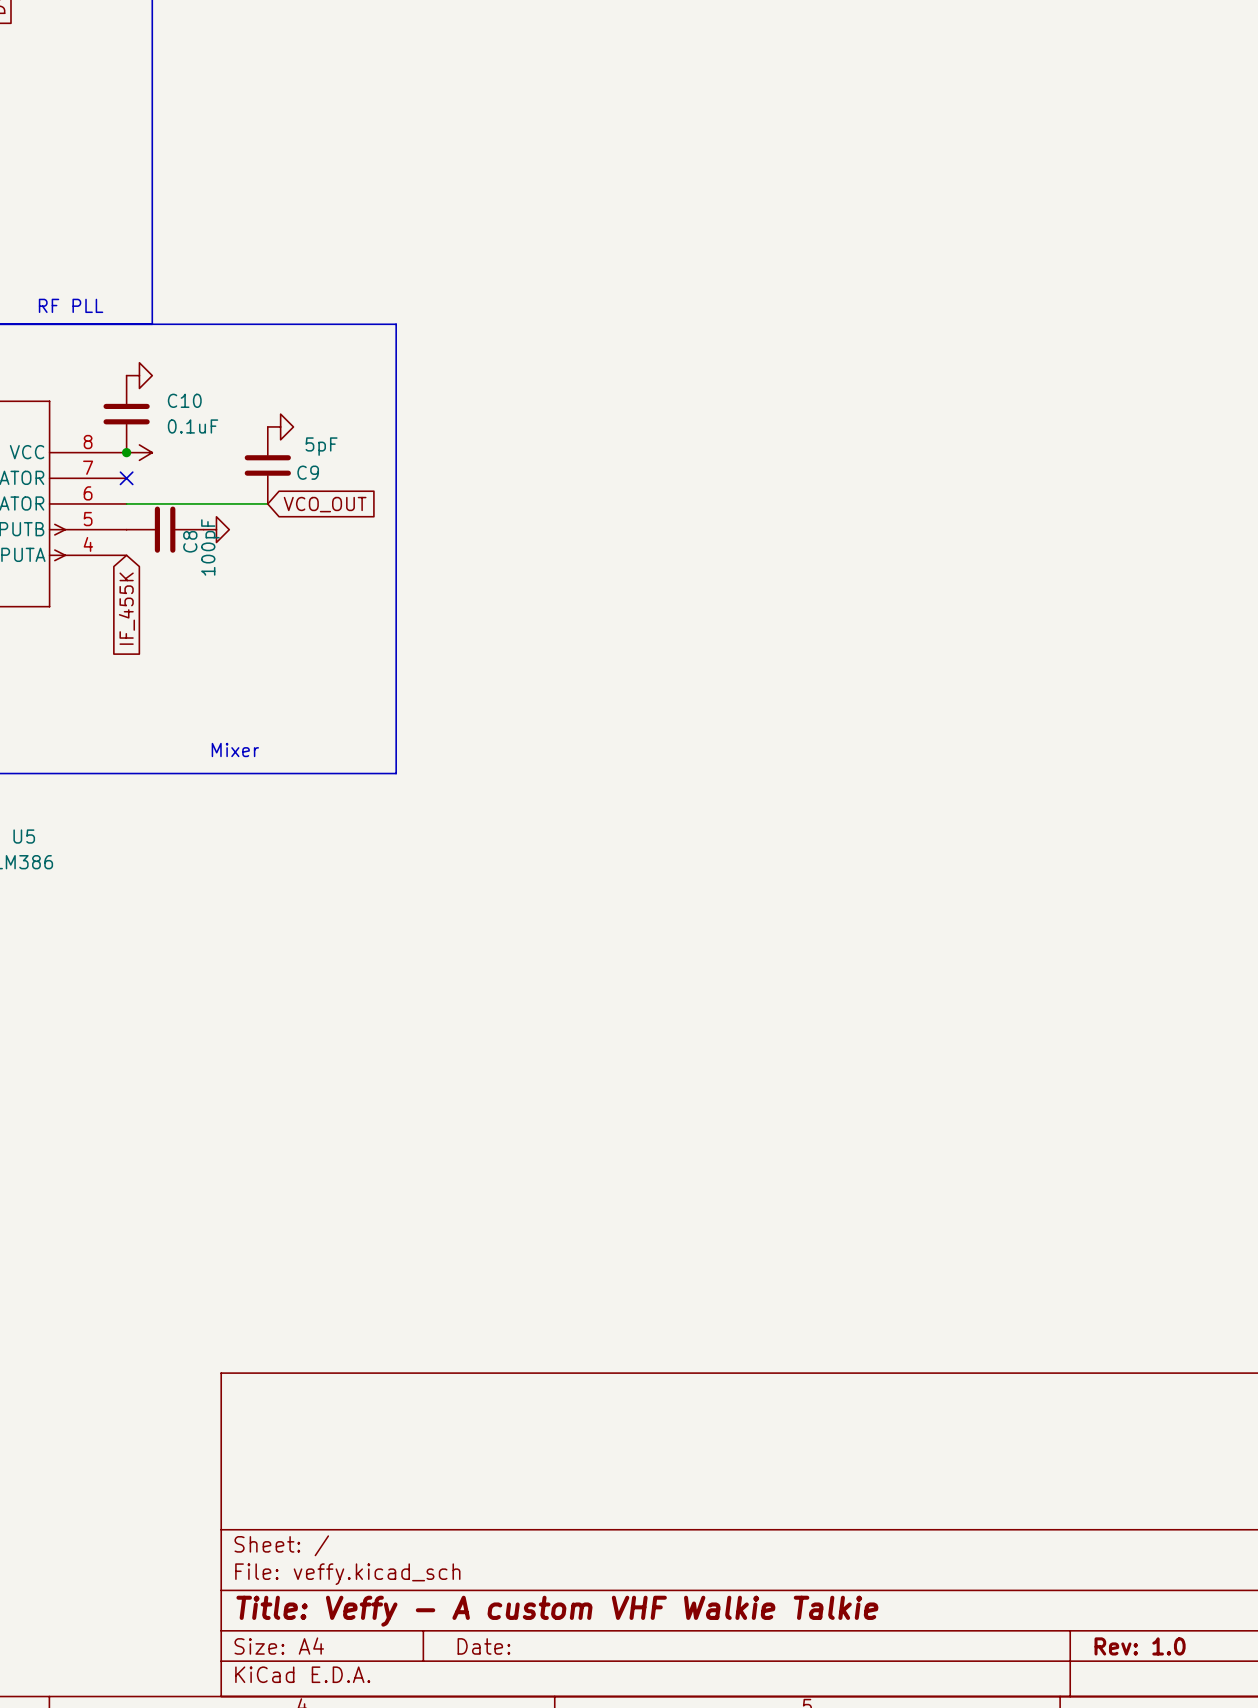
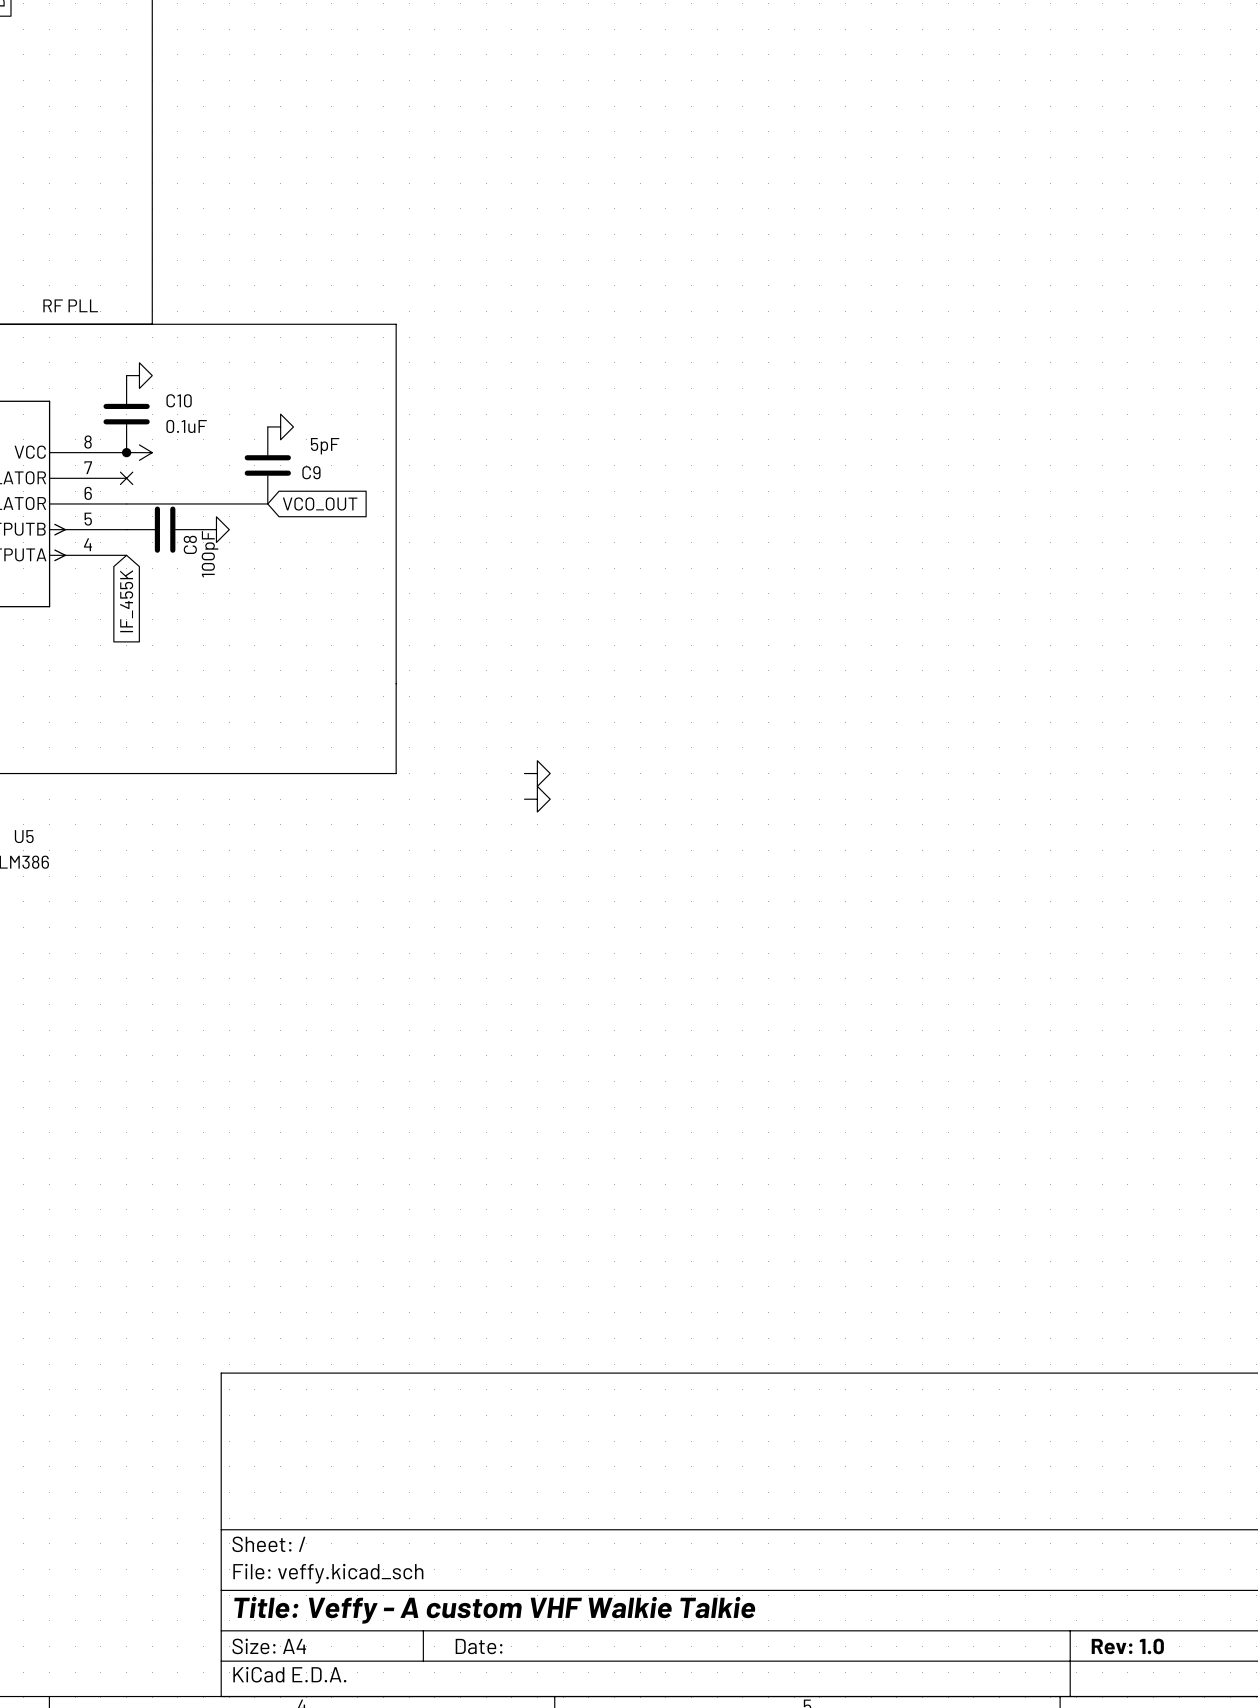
text: Mixer (235, 749) -> none
power symbol: none -> (537, 773)
power symbol: none -> (537, 799)

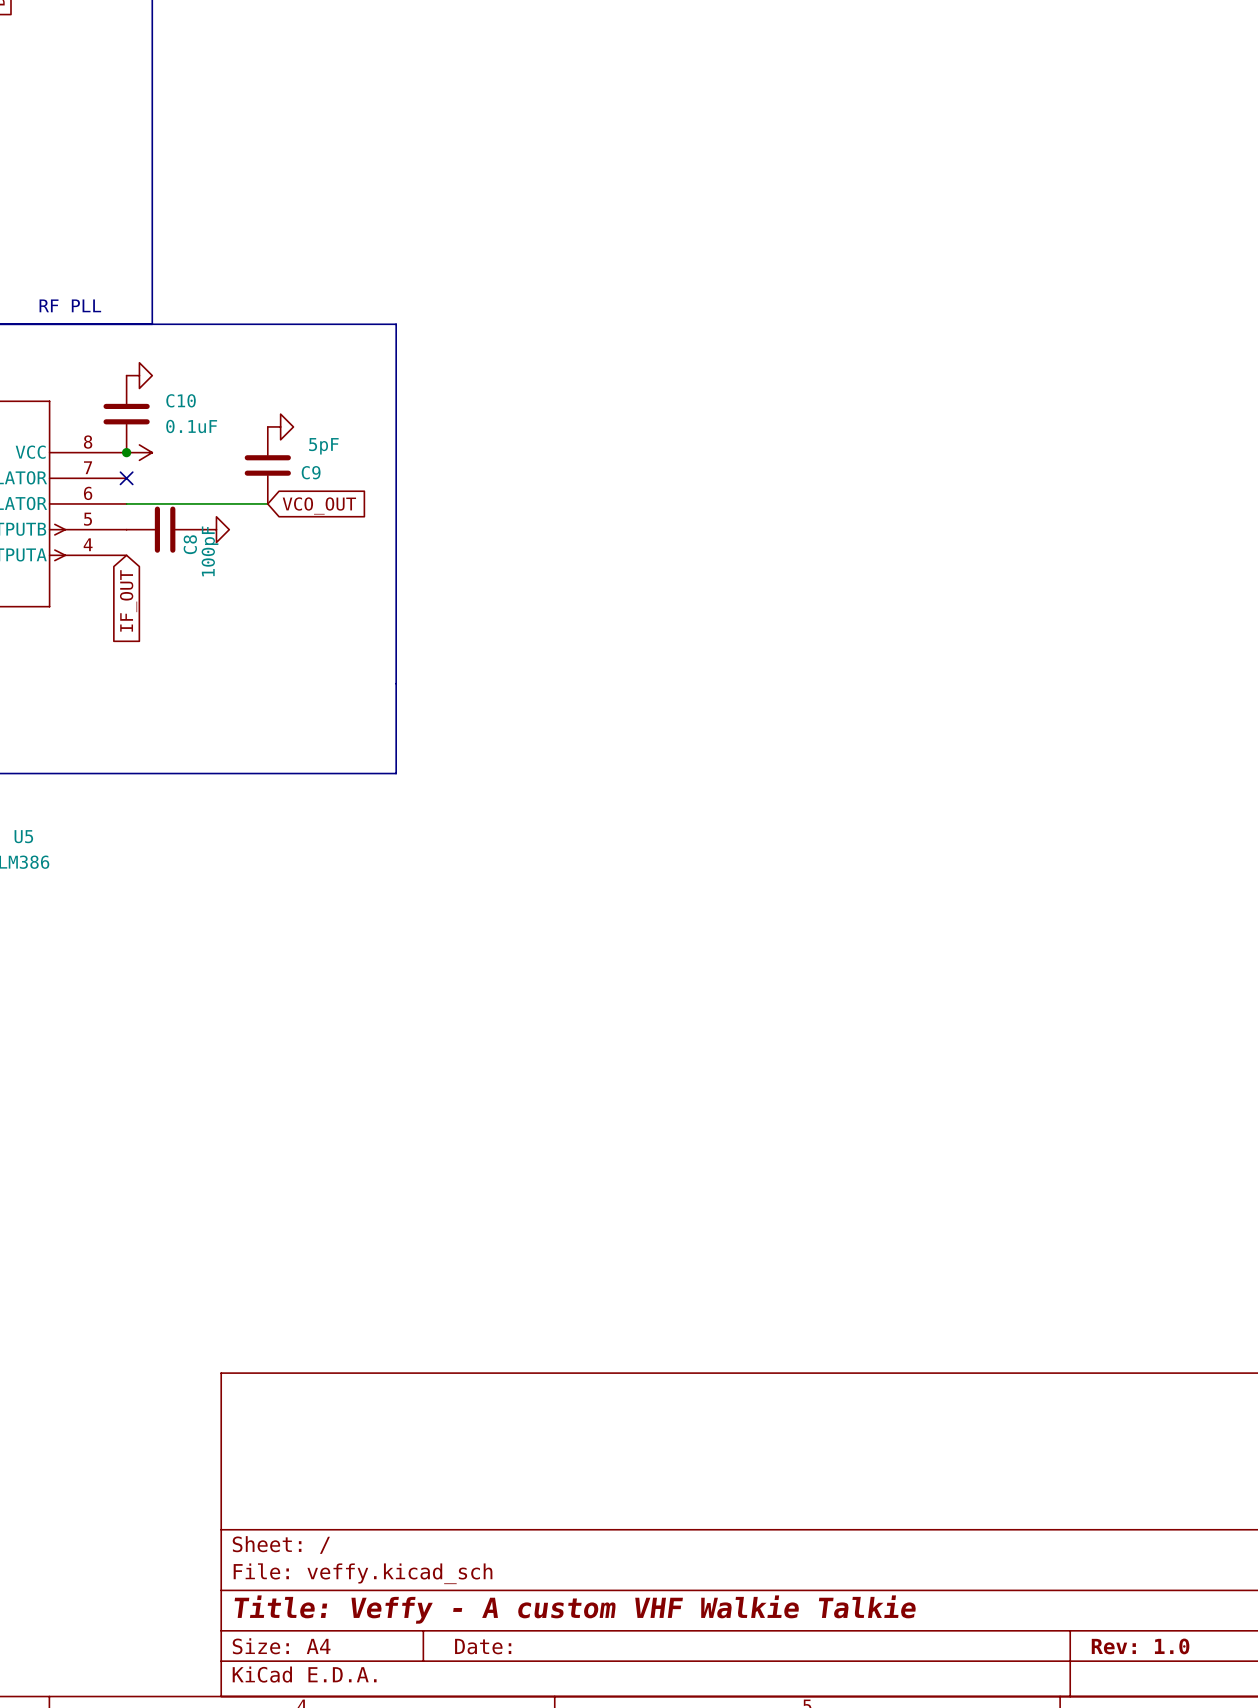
global label: IF_455K (126, 601) -> IF_OUT (128, 600)
power symbol: (537, 773) -> none
power symbol: (537, 799) -> none

